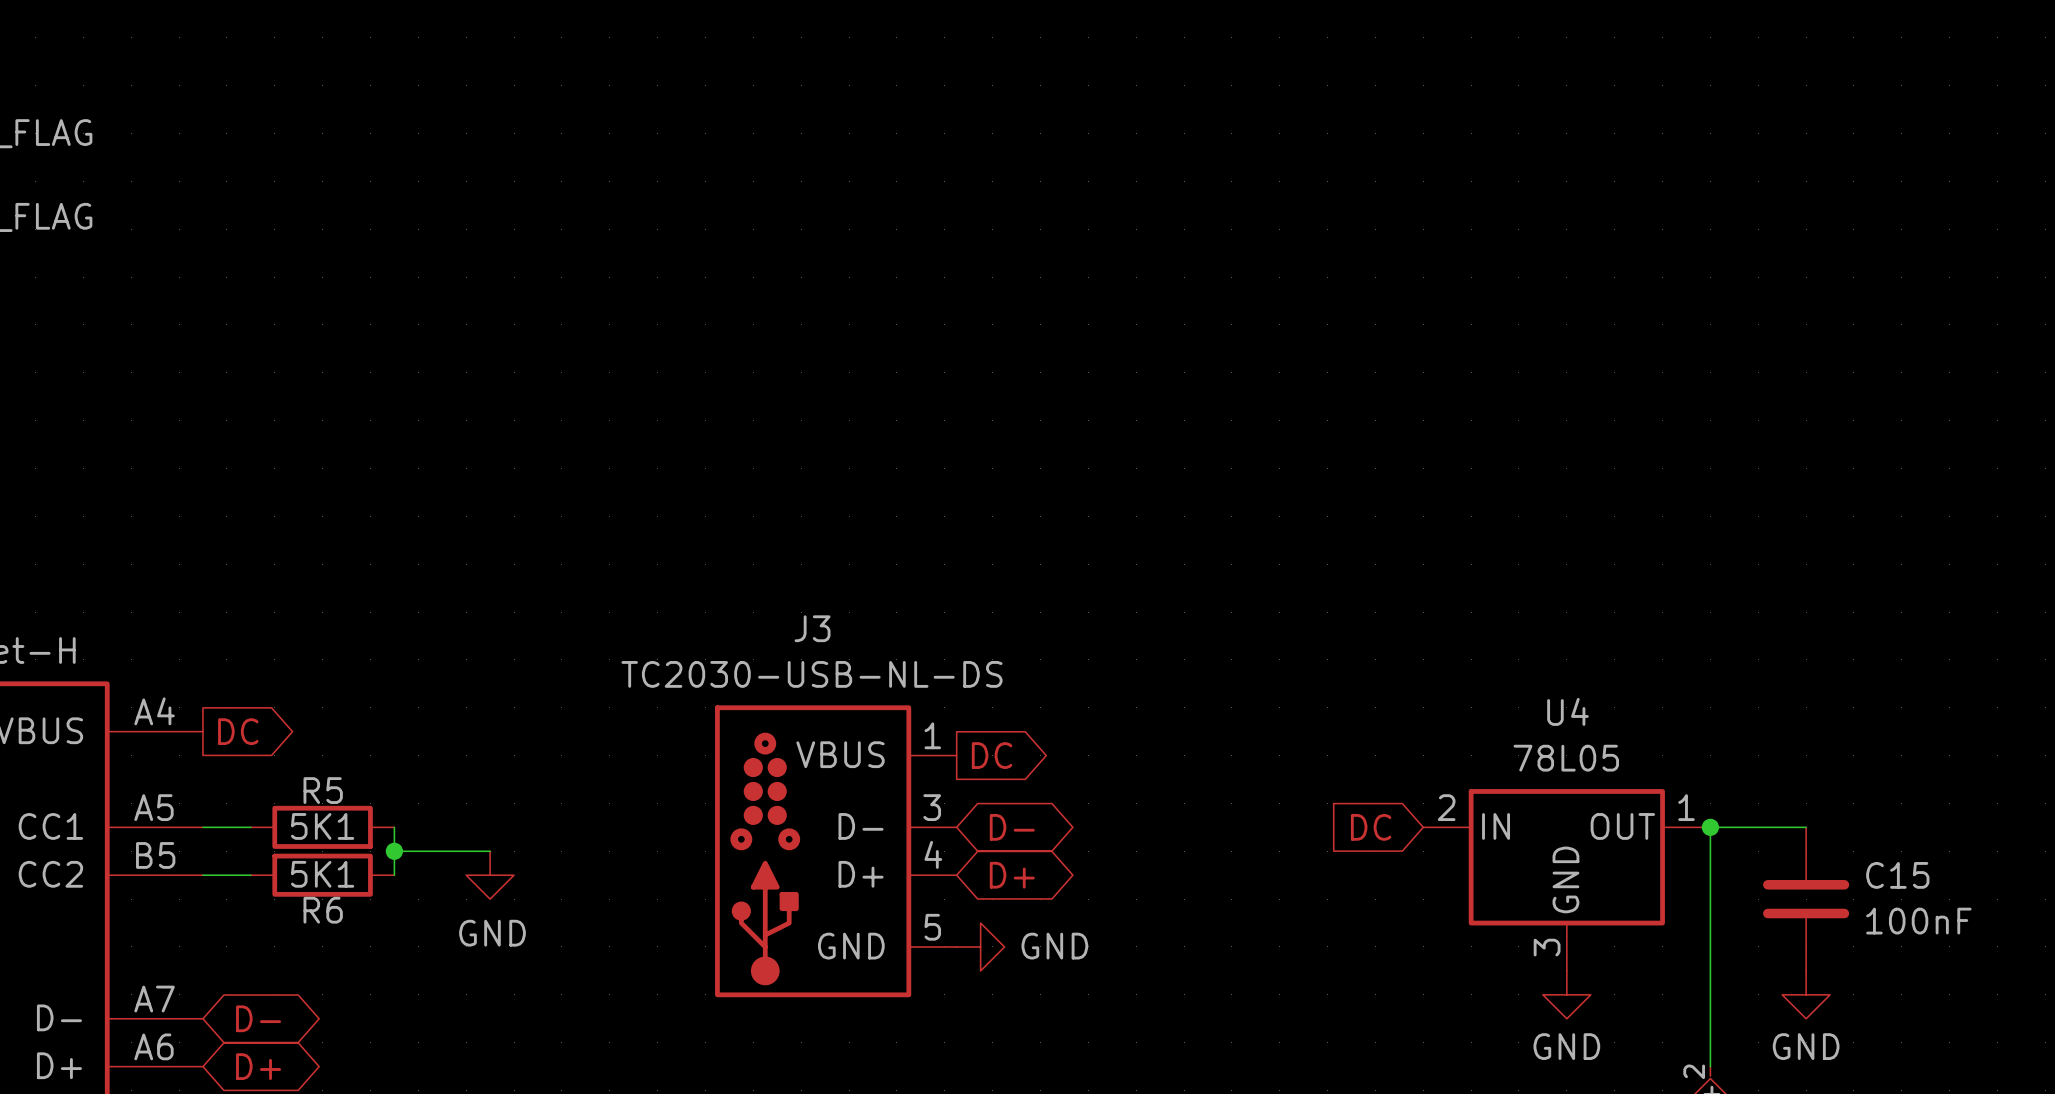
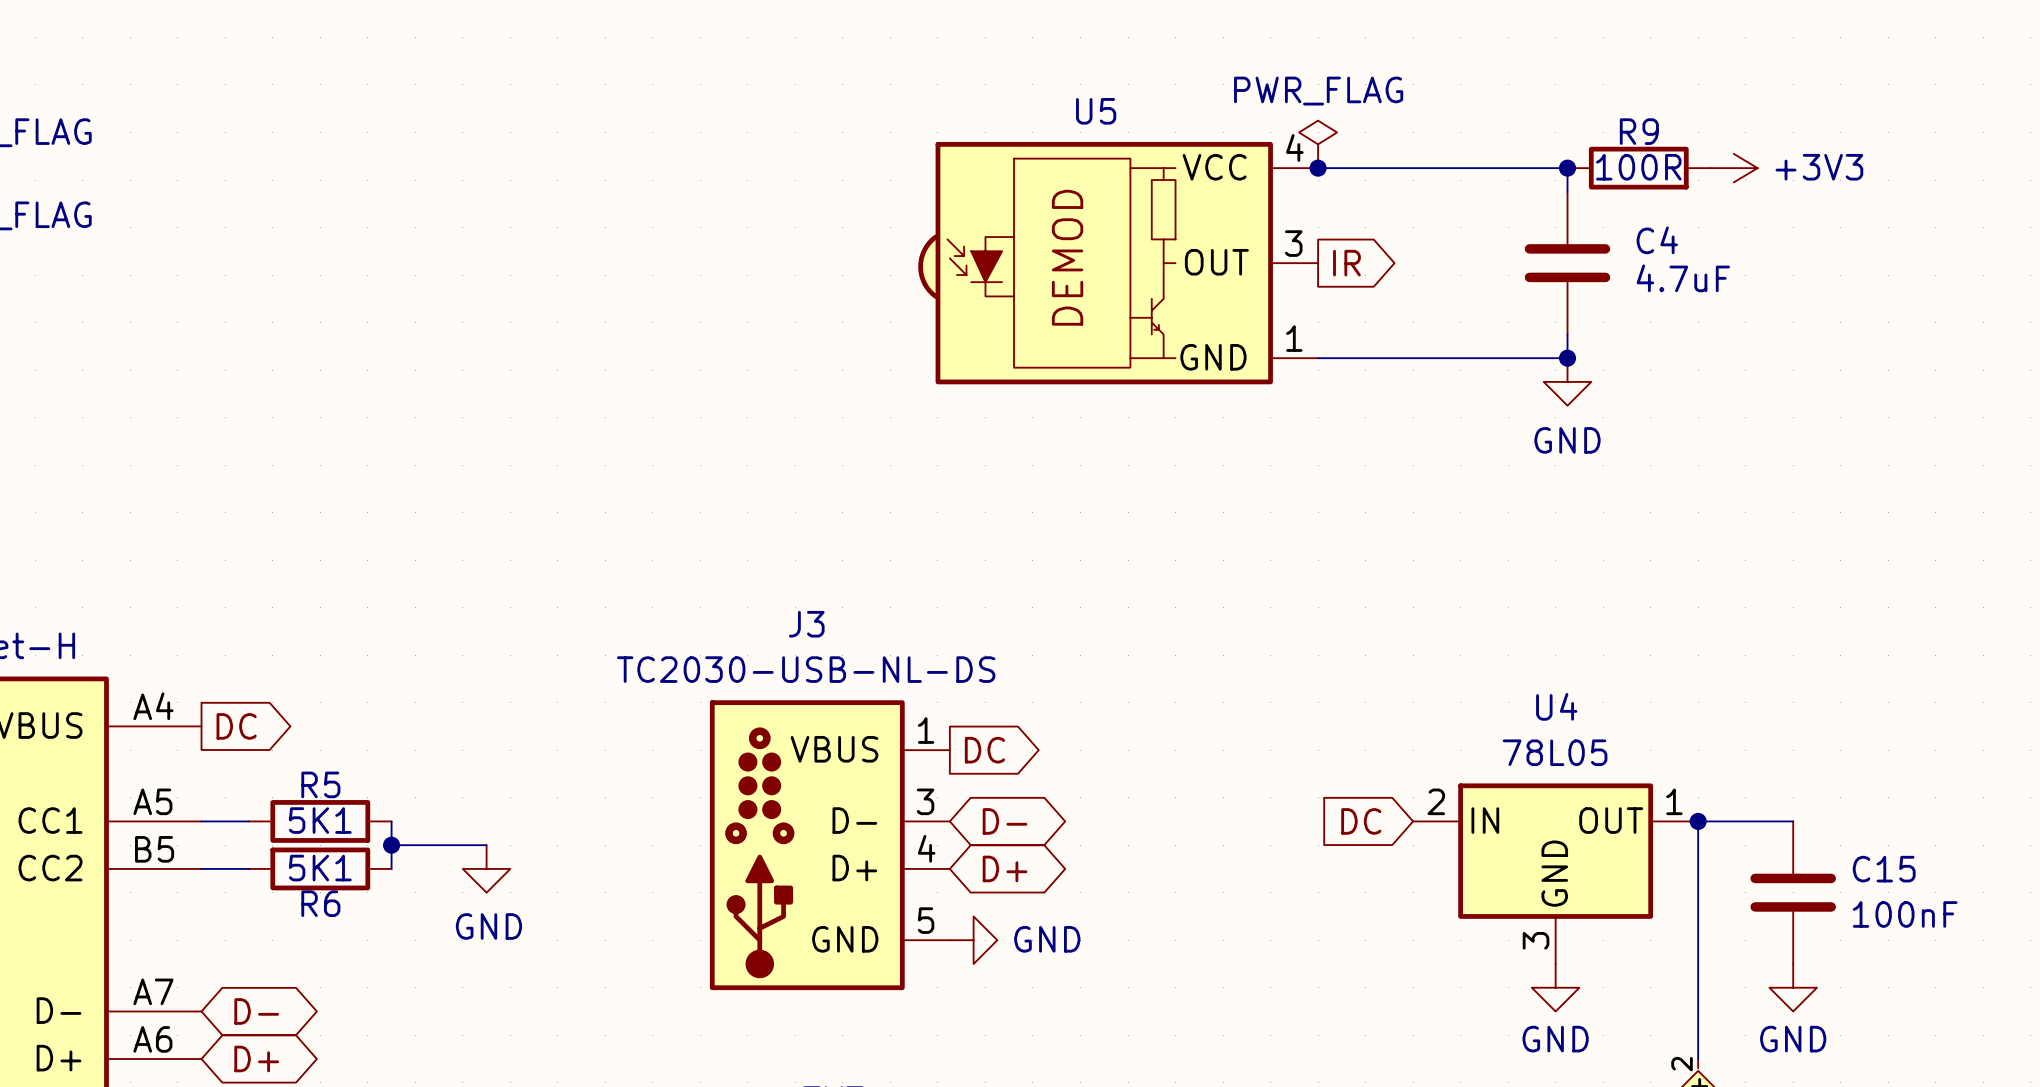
power symbol: none -> PWR_FLAG (1318, 144)
wire: none -> (1318, 168) (1567, 168) (1567, 191)
junction: none -> (1318, 168)
junction: none -> (1567, 168)
R9: none -> 100R (1638, 168)
power symbol: none -> +3V3 (1733, 168)
U5: none -> (1118, 263)
global label: none -> IR (1346, 263)
C4: none -> 4.7uF (1567, 263)
wire: none -> (1567, 334) (1567, 358) (1318, 358)
junction: none -> (1567, 358)
power symbol: none -> GND (1567, 381)

